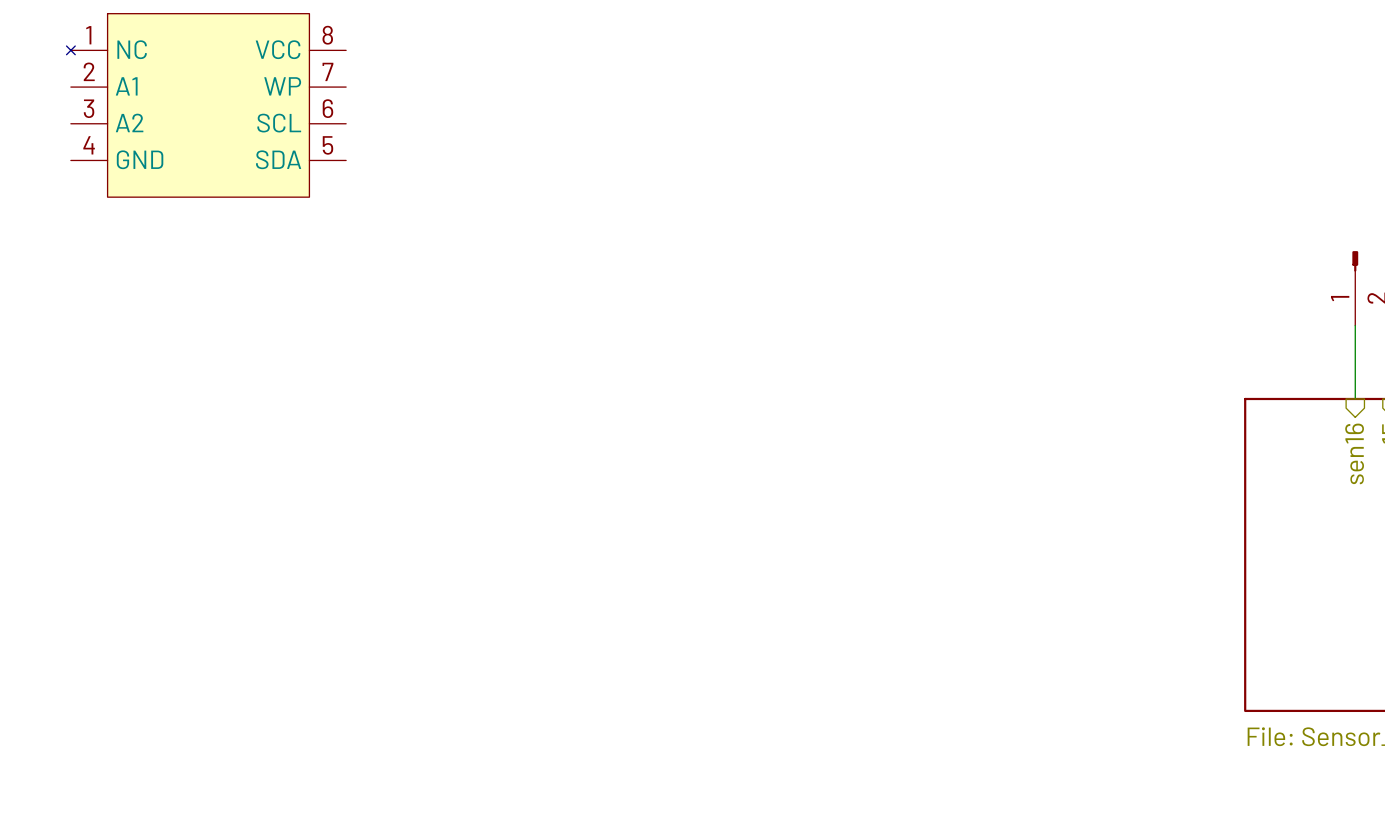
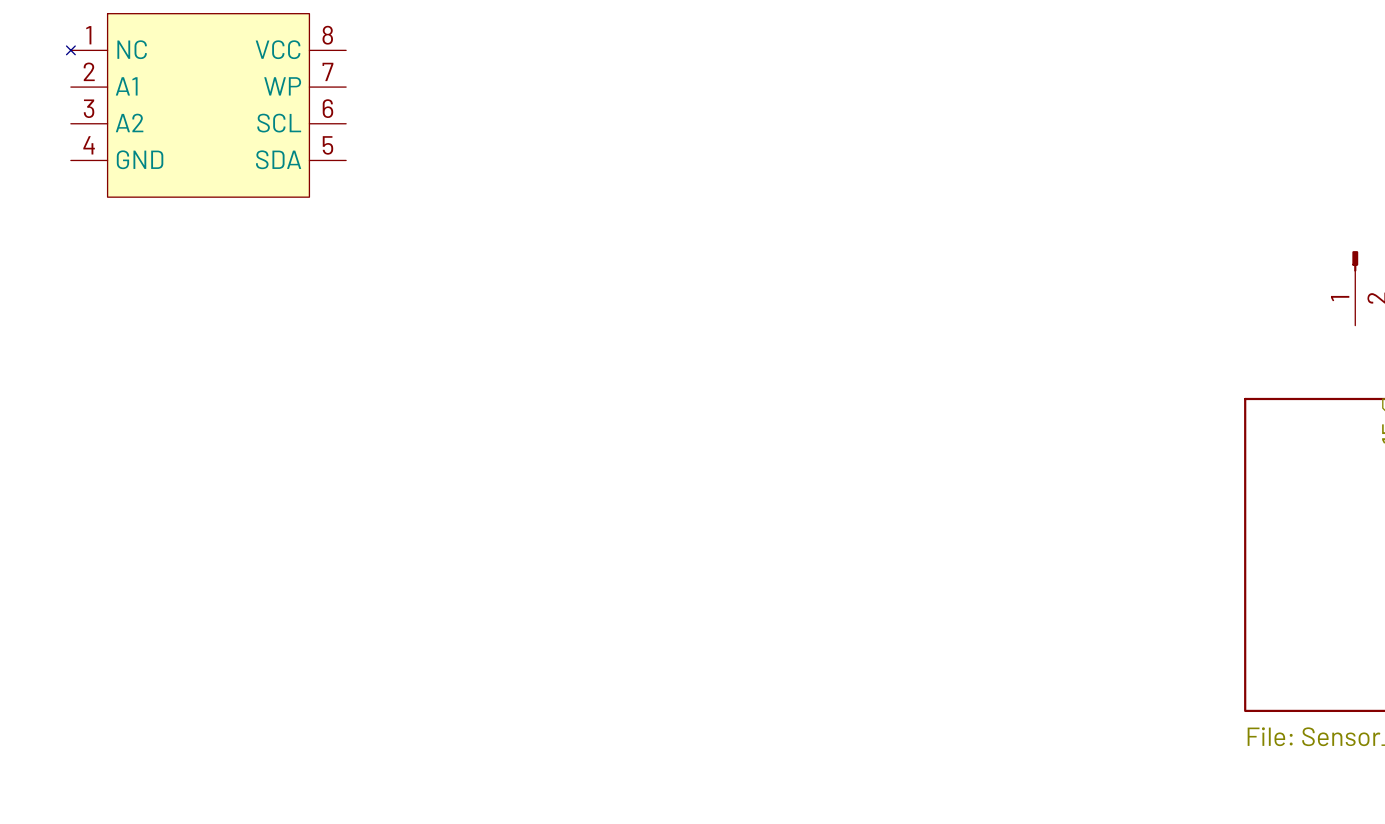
wire: (1355, 325) (1355, 398) -> none
hierarchical label: sen16 (1354, 453) -> none

